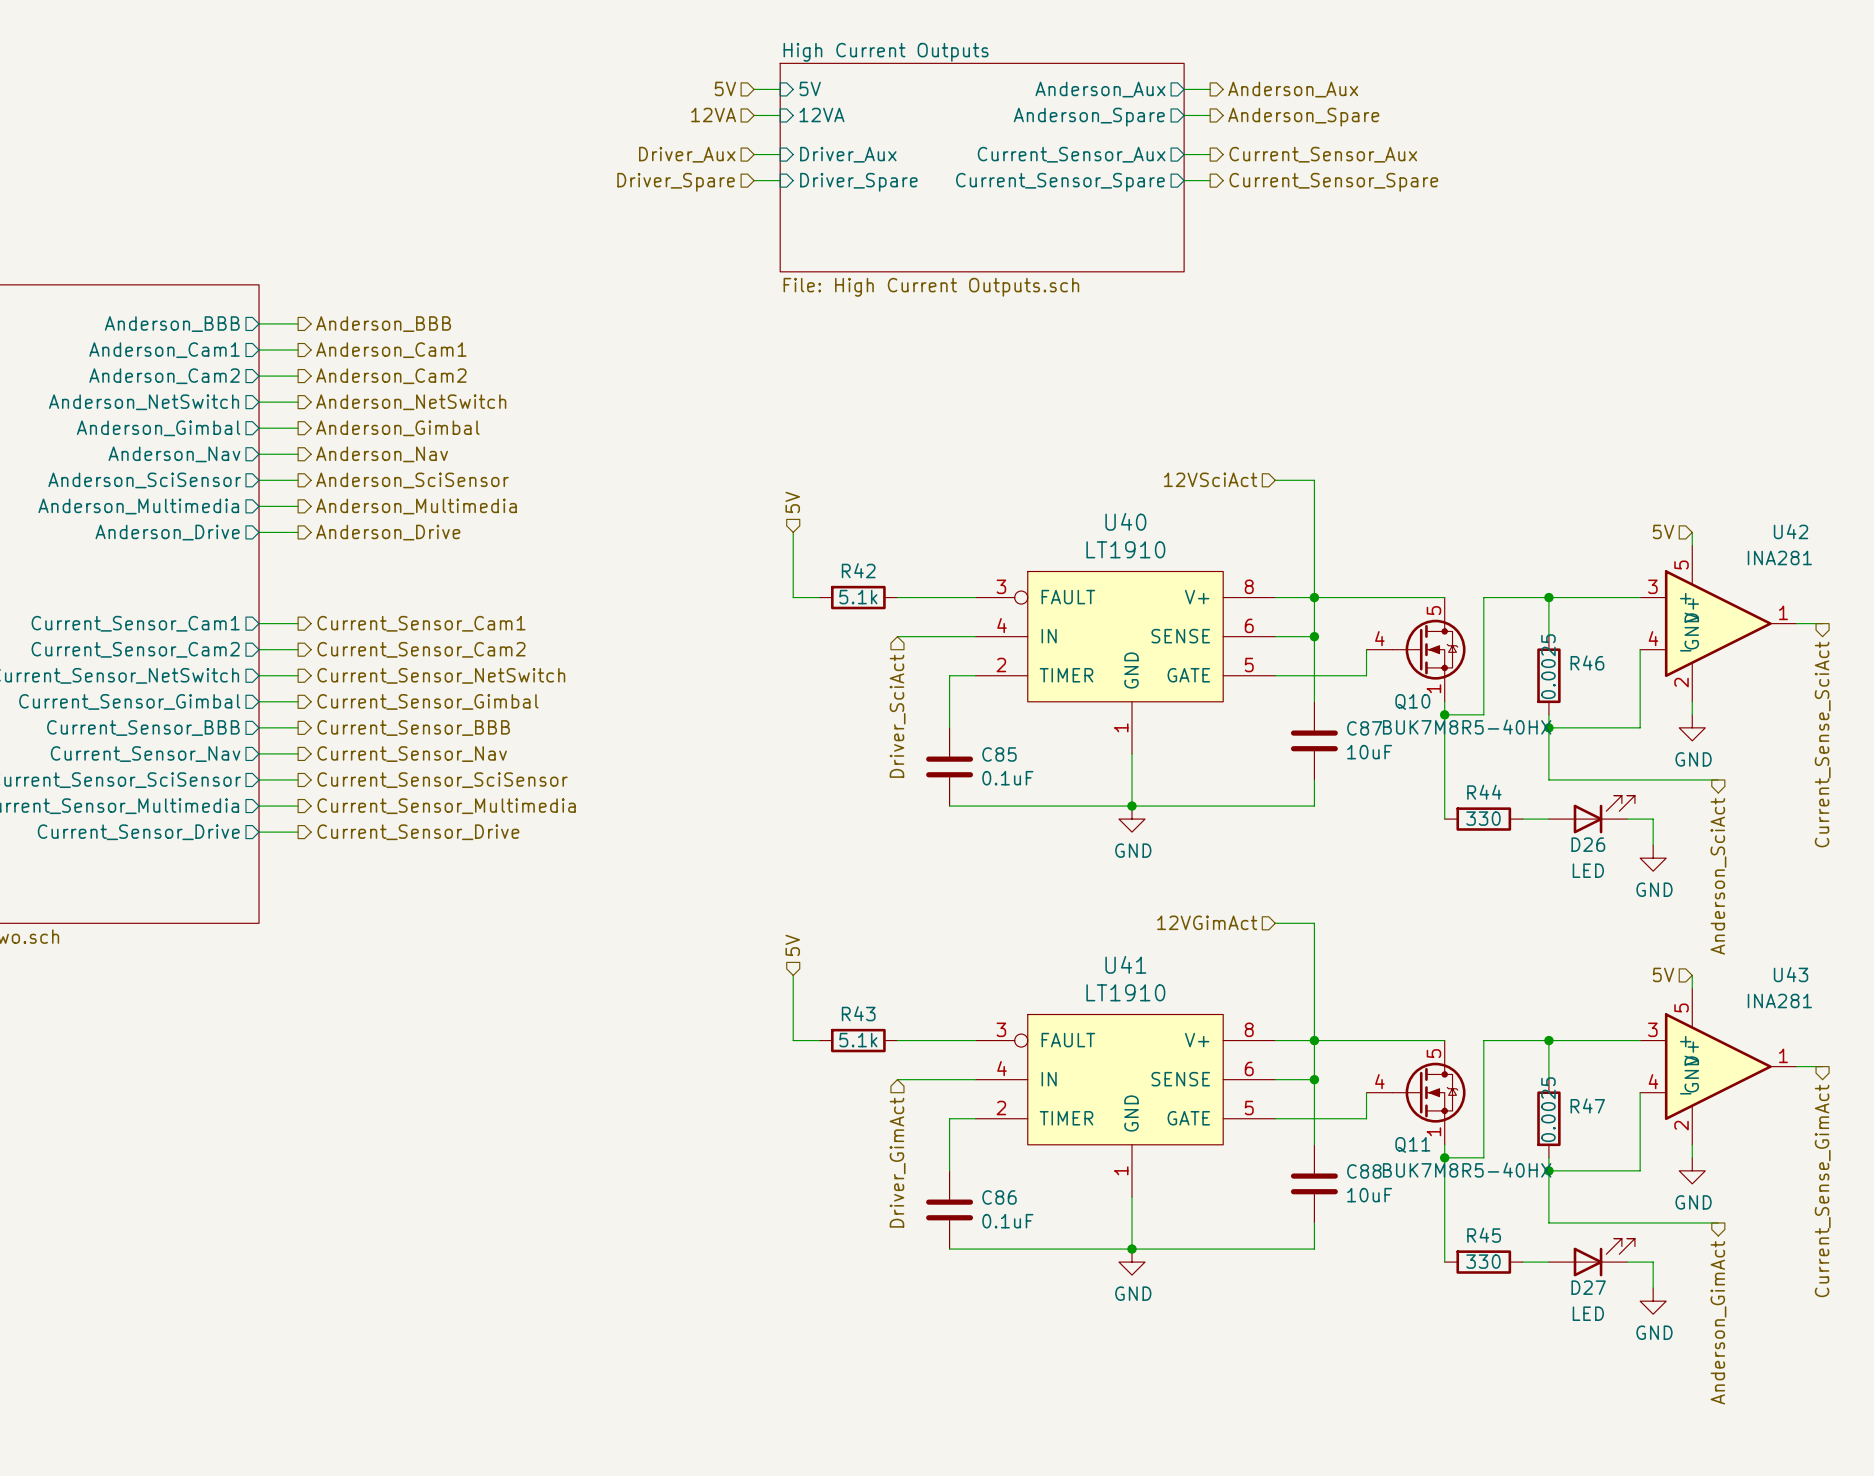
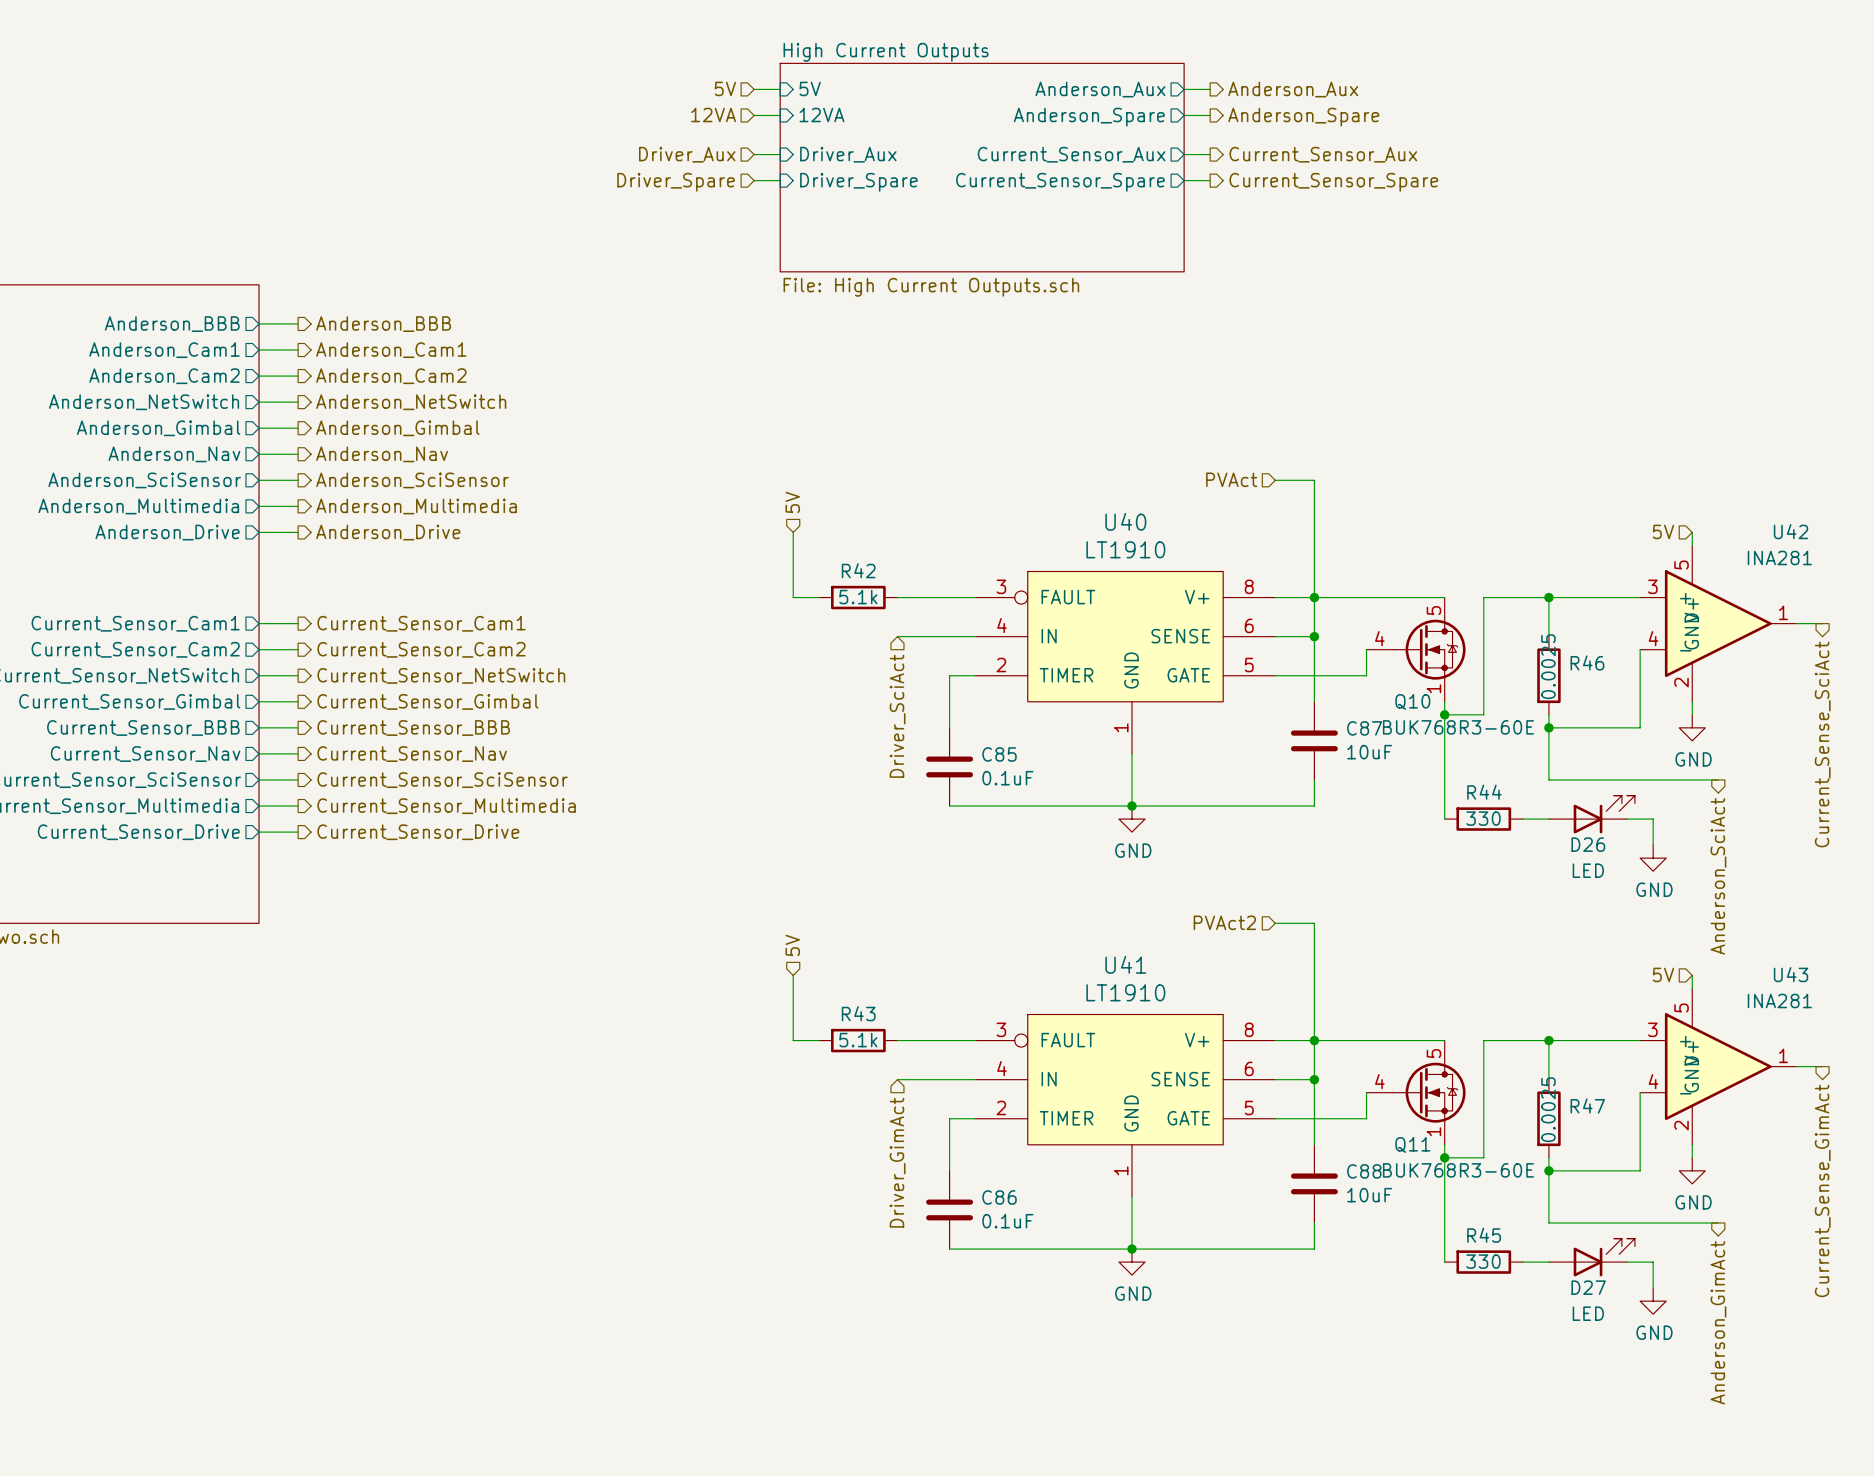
hierarchical label: 12VSciAct (1210, 479) -> PVAct (1231, 479)
Q10 value: BUK7M8R5-40HX (1467, 727) -> BUK768R3-60E (1458, 727)
hierarchical label: 12VGimAct (1207, 922) -> PVAct2 (1224, 922)
Q11 value: BUK7M8R5-40HX (1467, 1170) -> BUK768R3-60E (1458, 1170)

